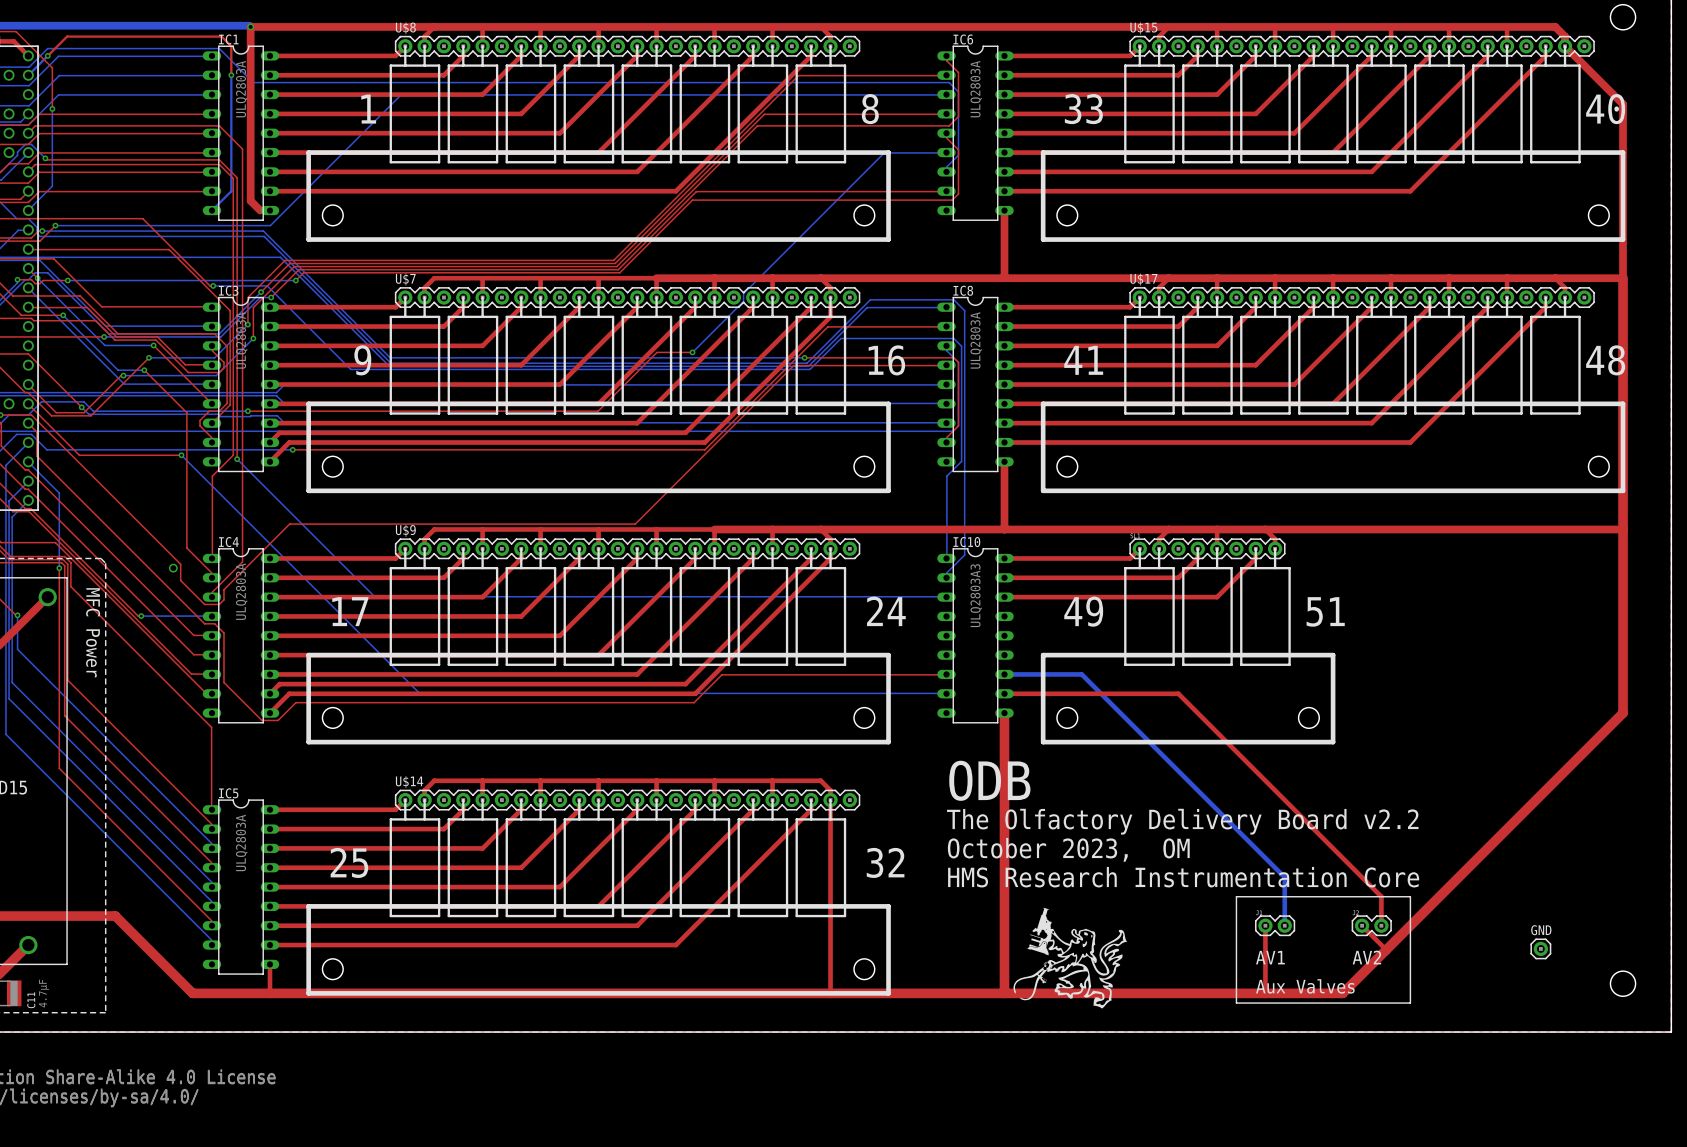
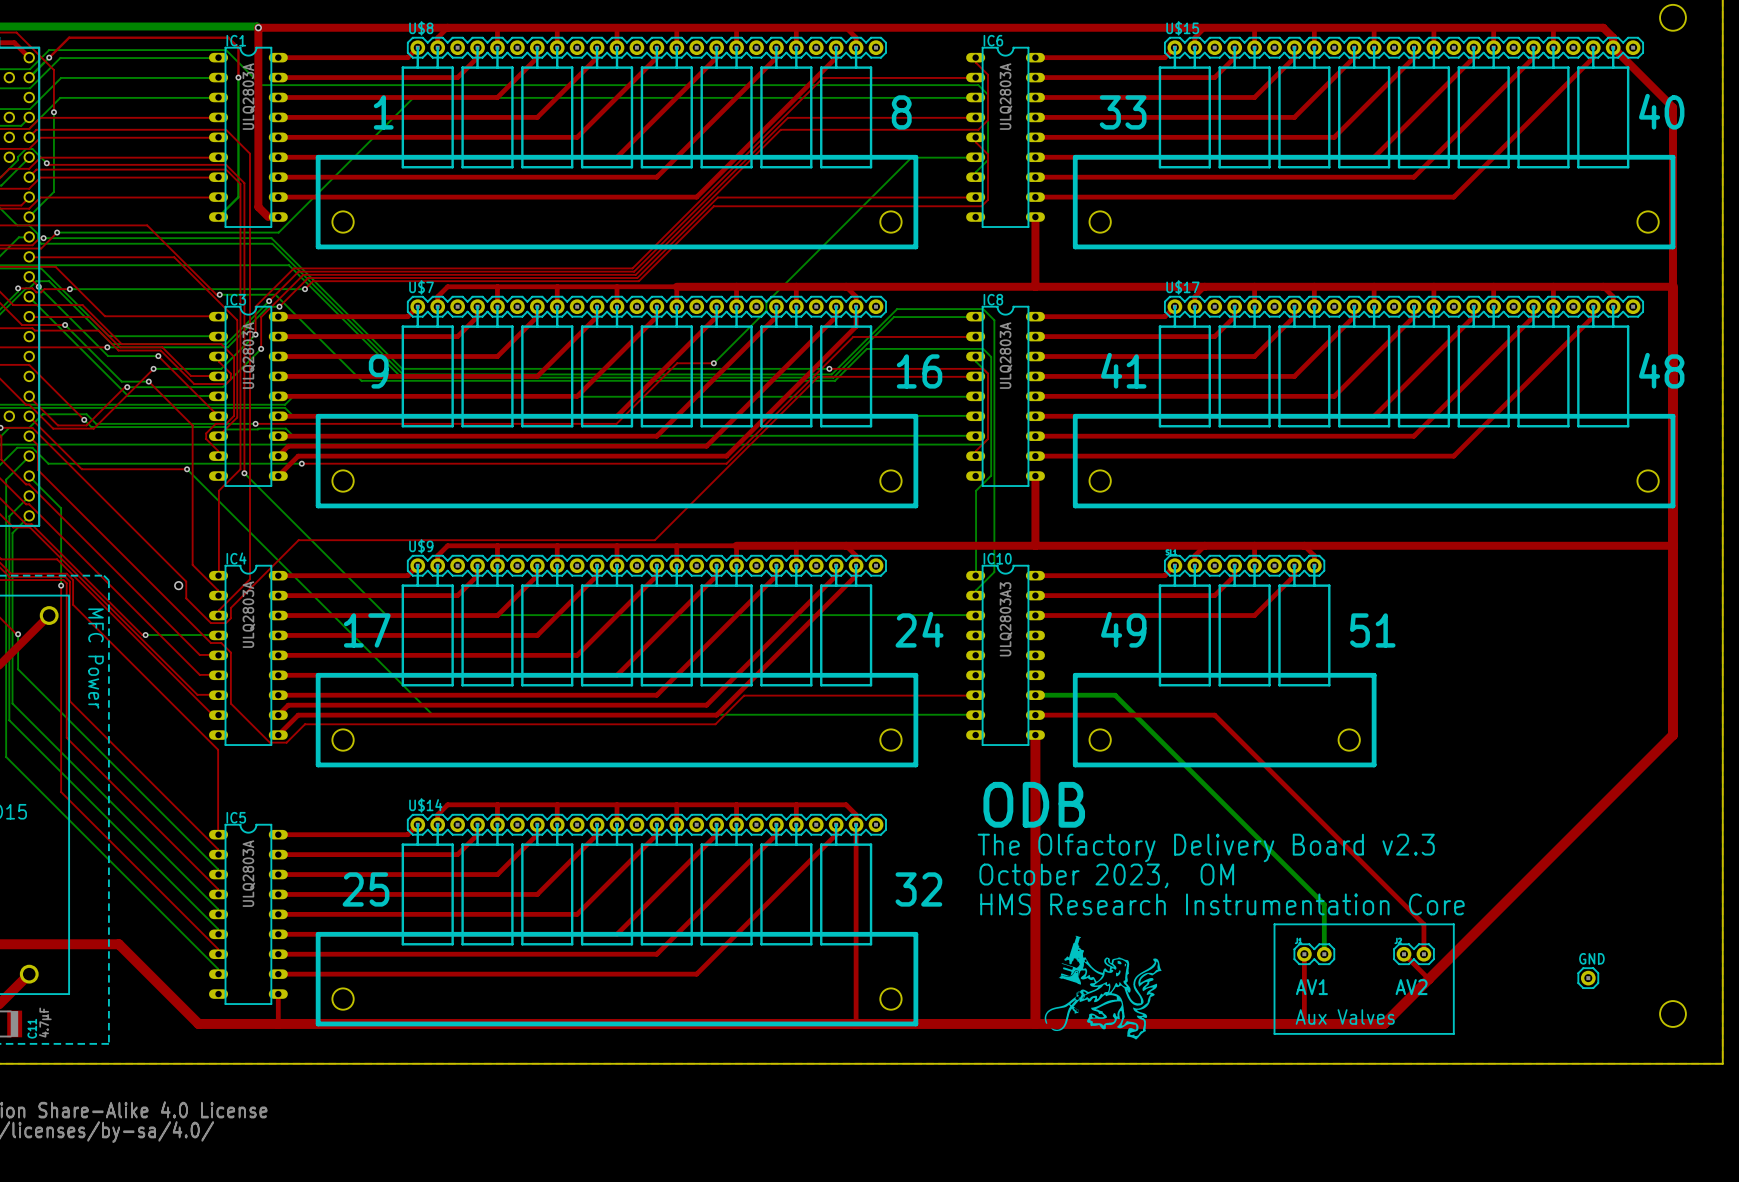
text: The Olfactory Delivery Board v2.2 (1182, 821) -> The Olfactory Delivery Board v2.3 (1206, 847)

